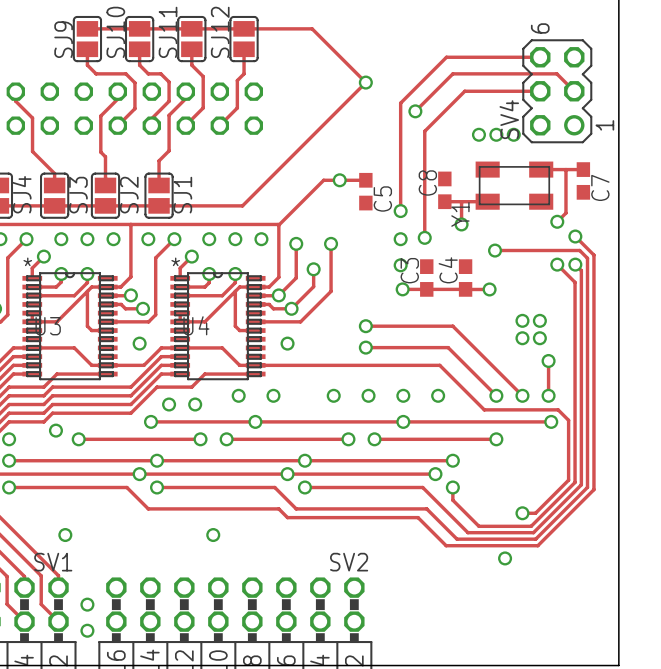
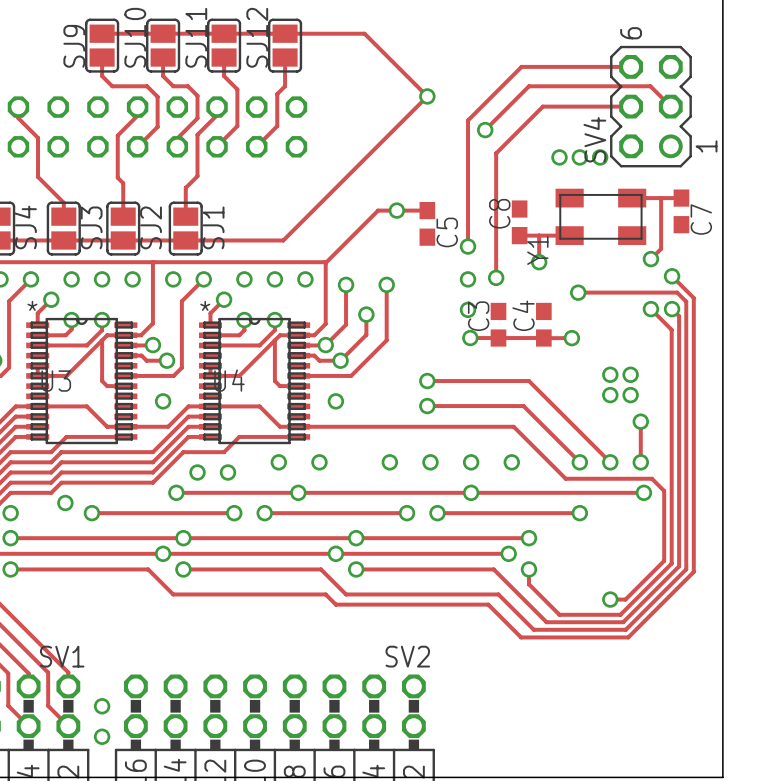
via: (65, 535) -> none
via: (213, 535) -> none
via: (505, 558) -> none

